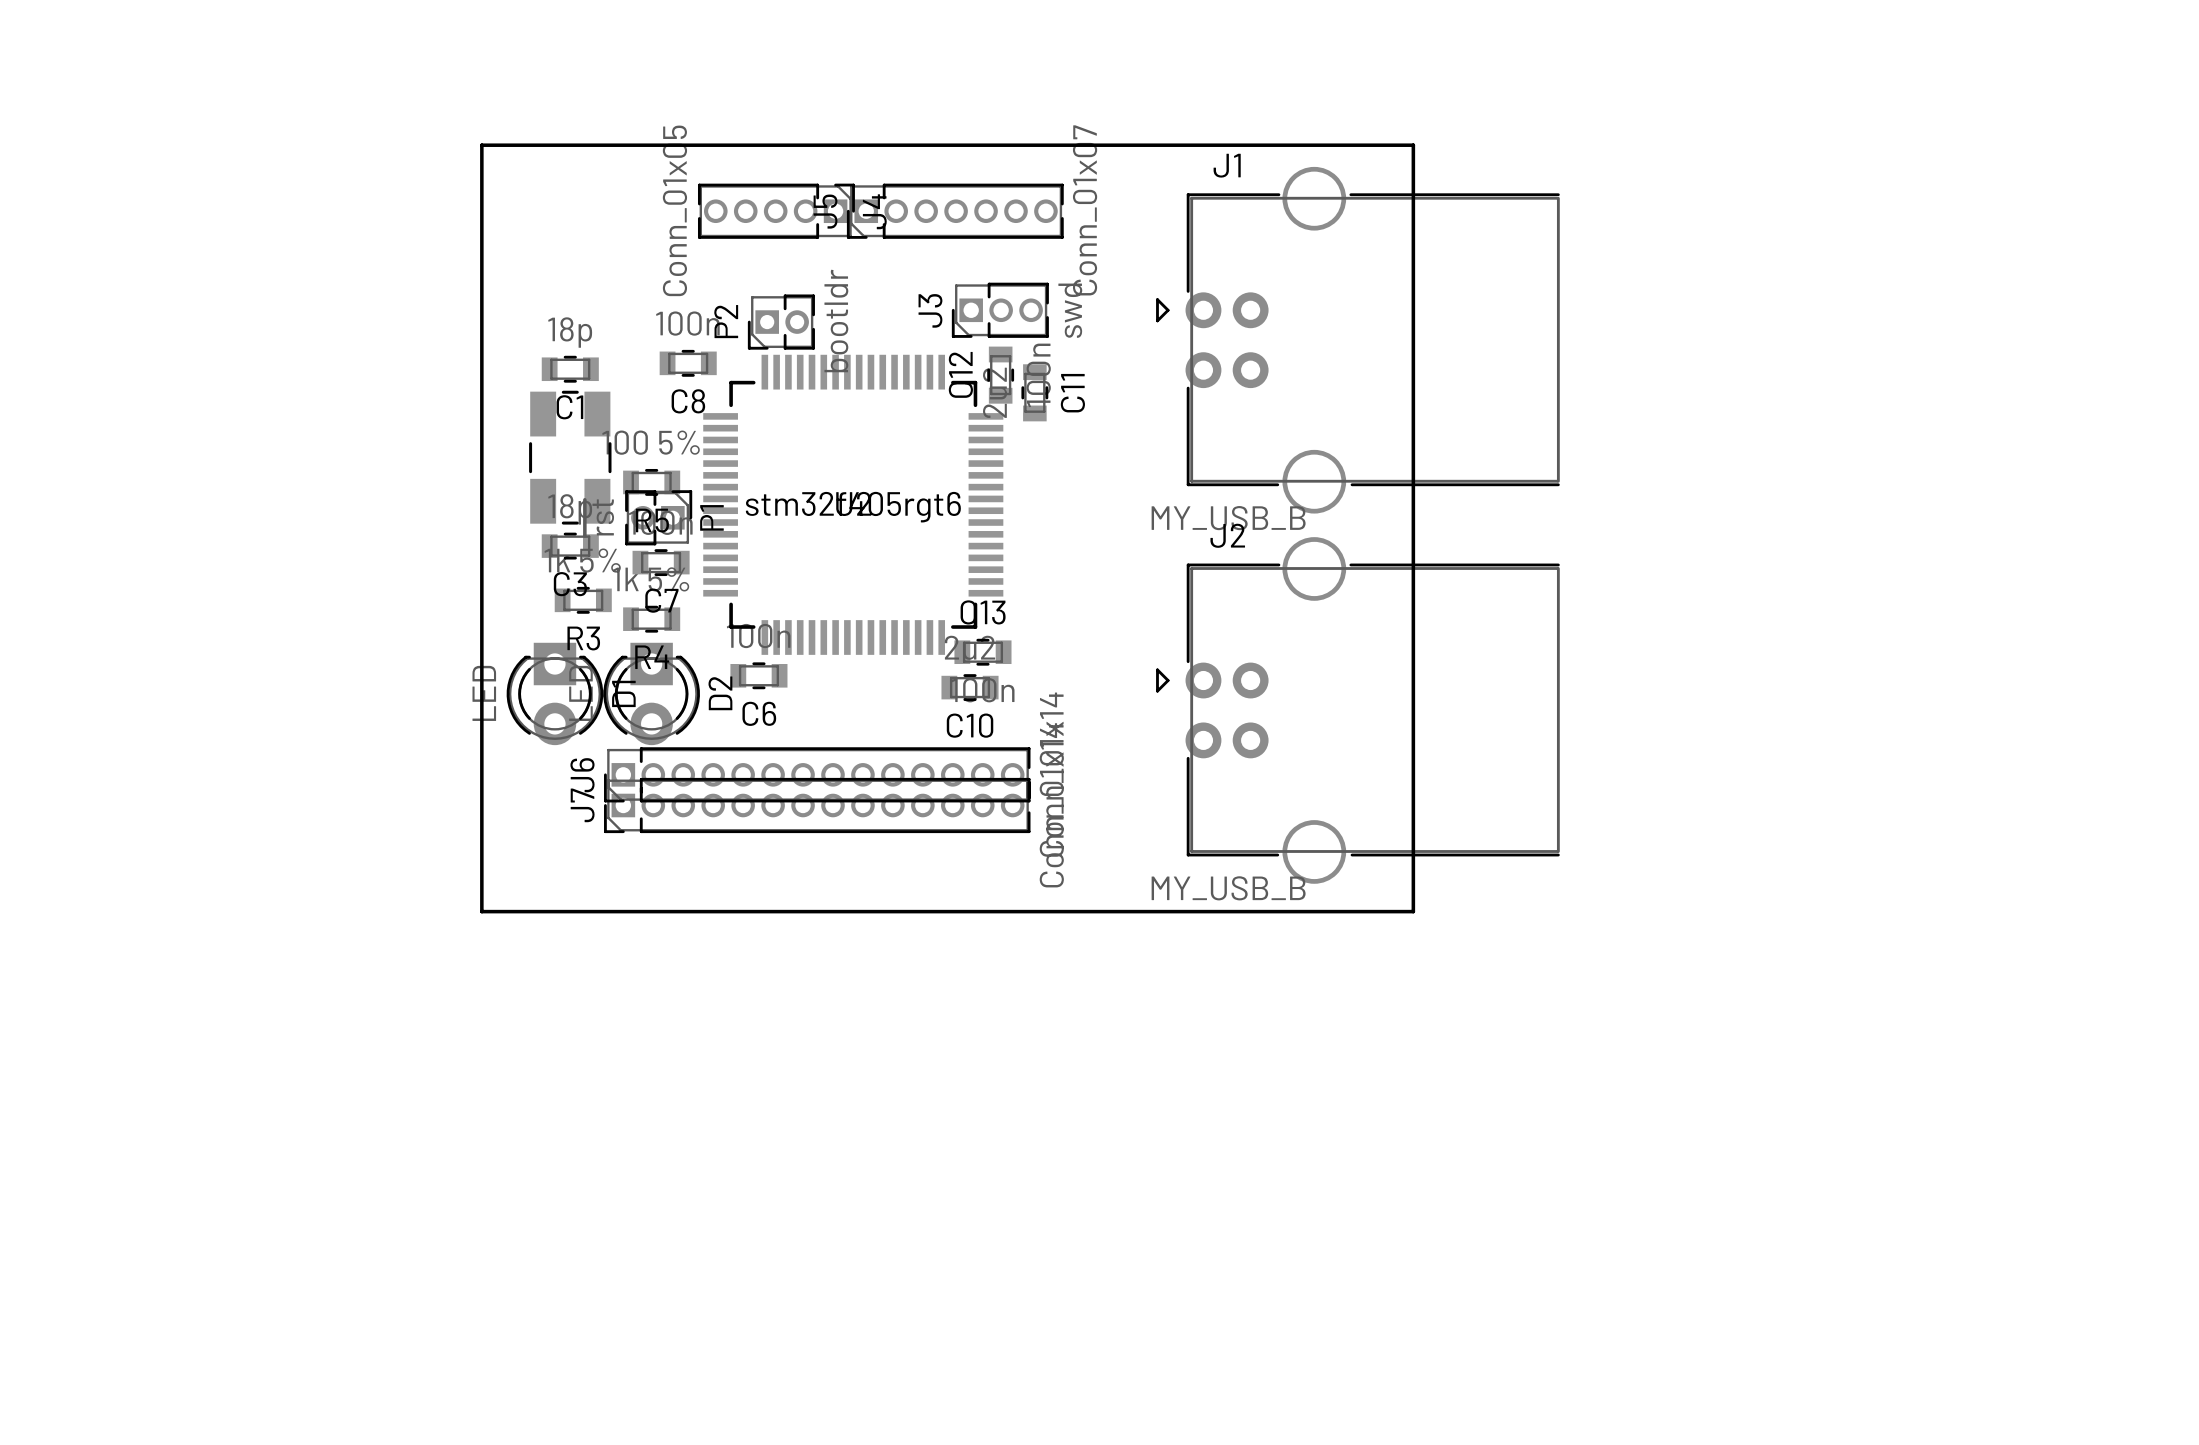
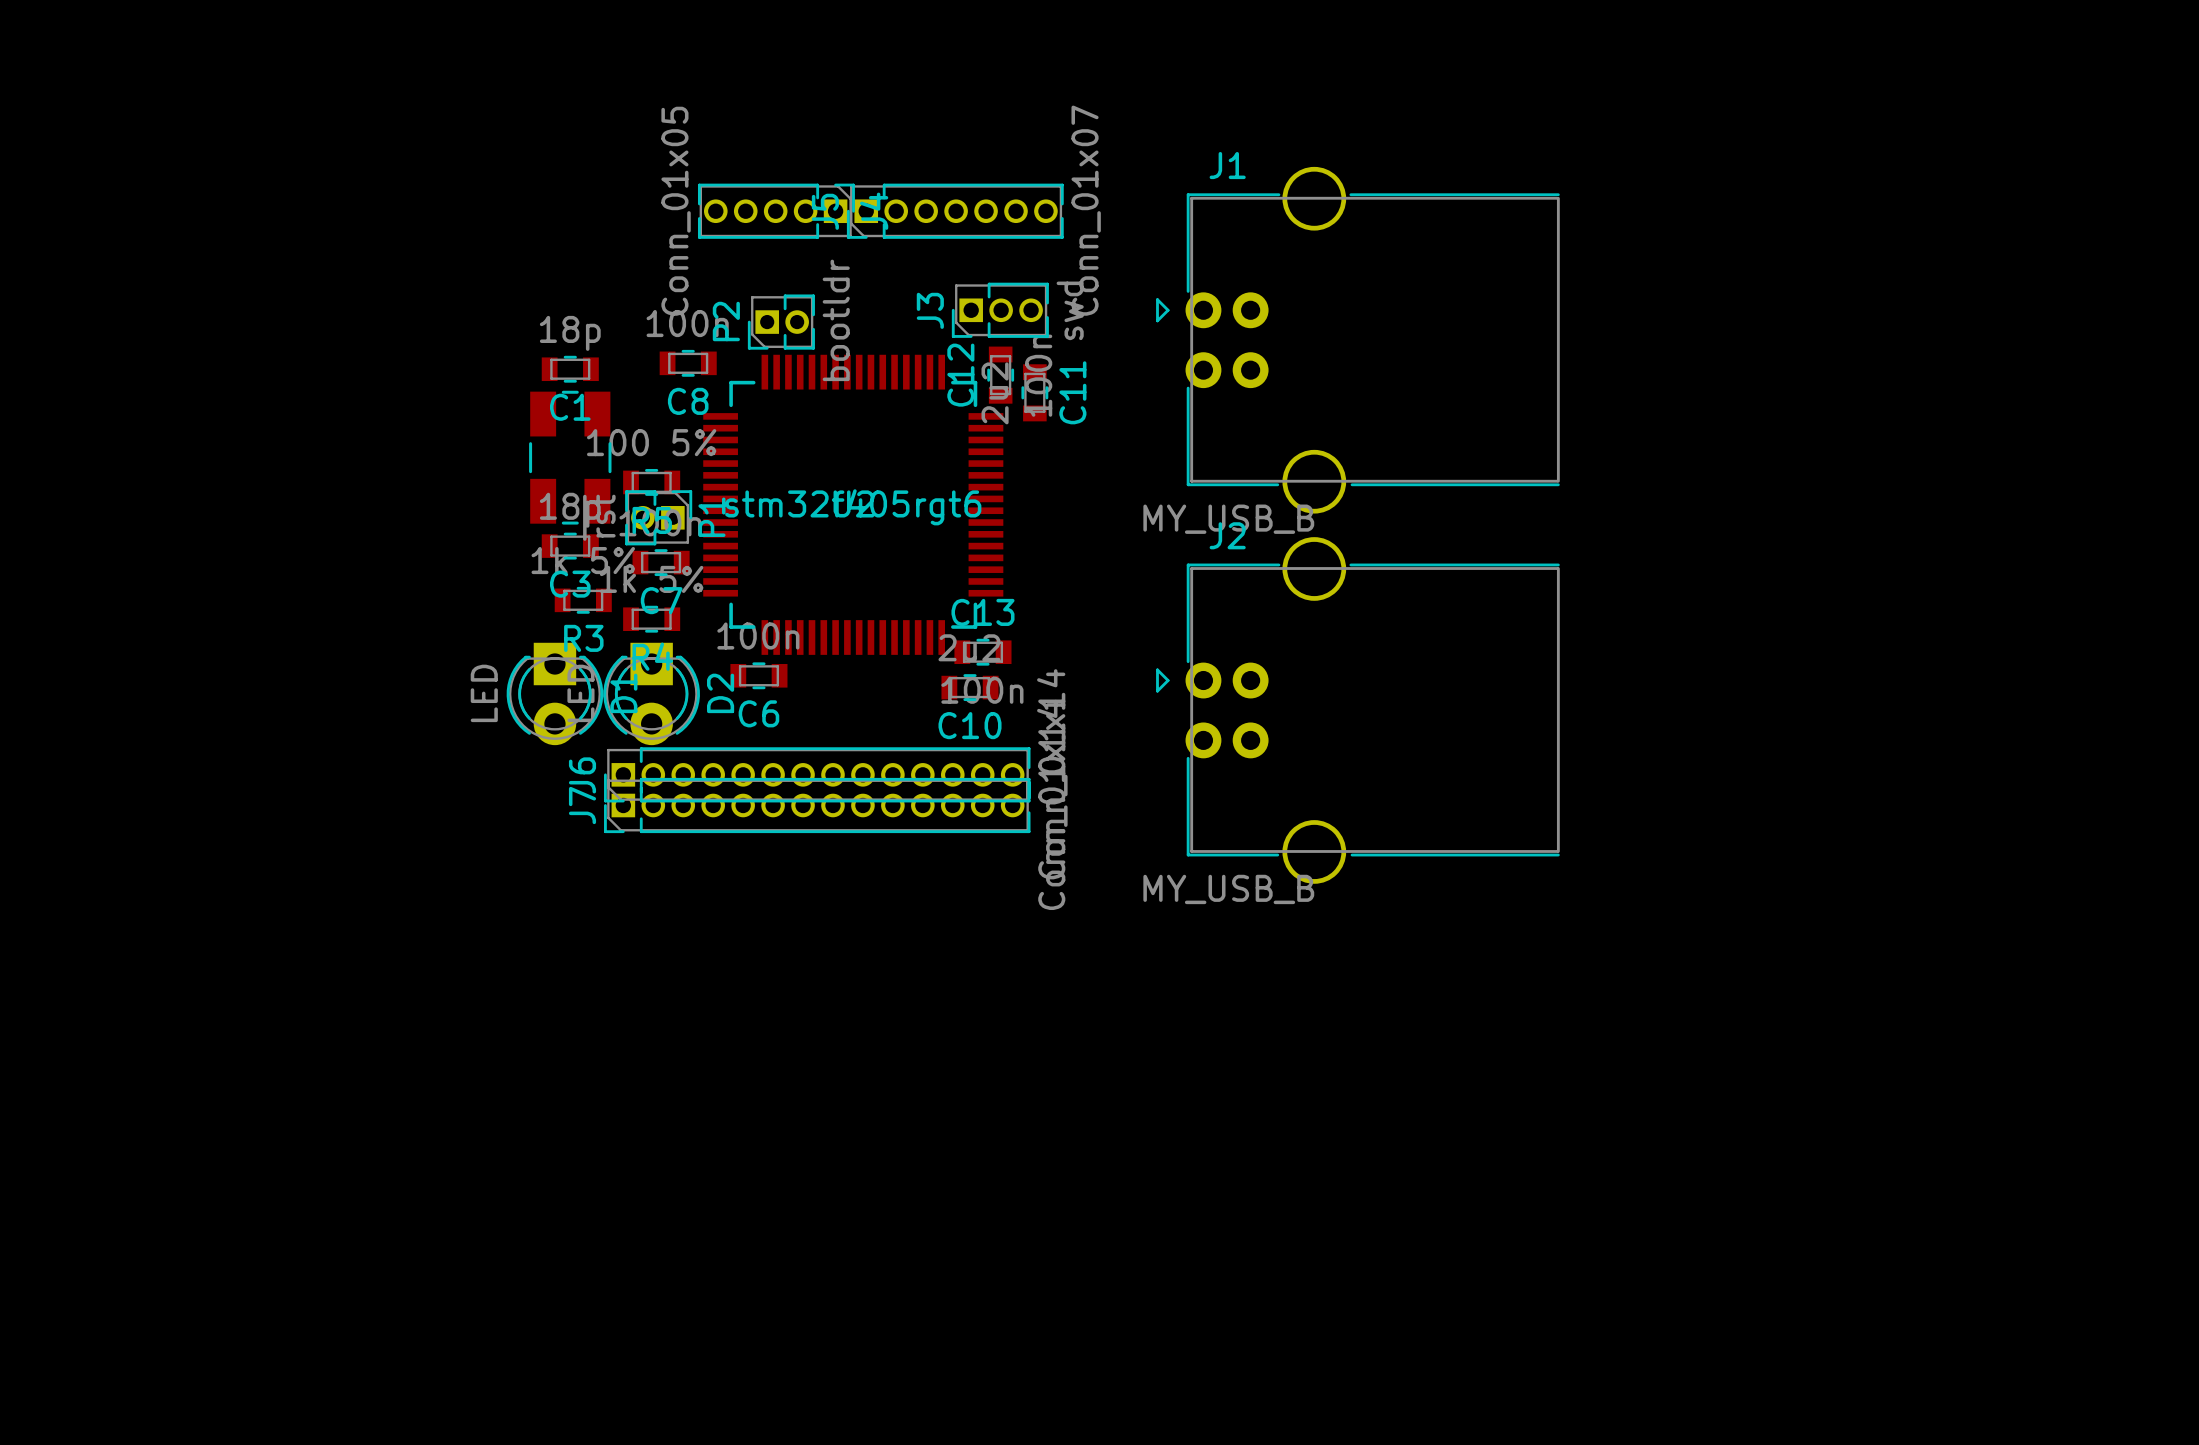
board edge: (481, 145) (1413, 145) (1413, 911) (481, 911) (481, 145) -> none

